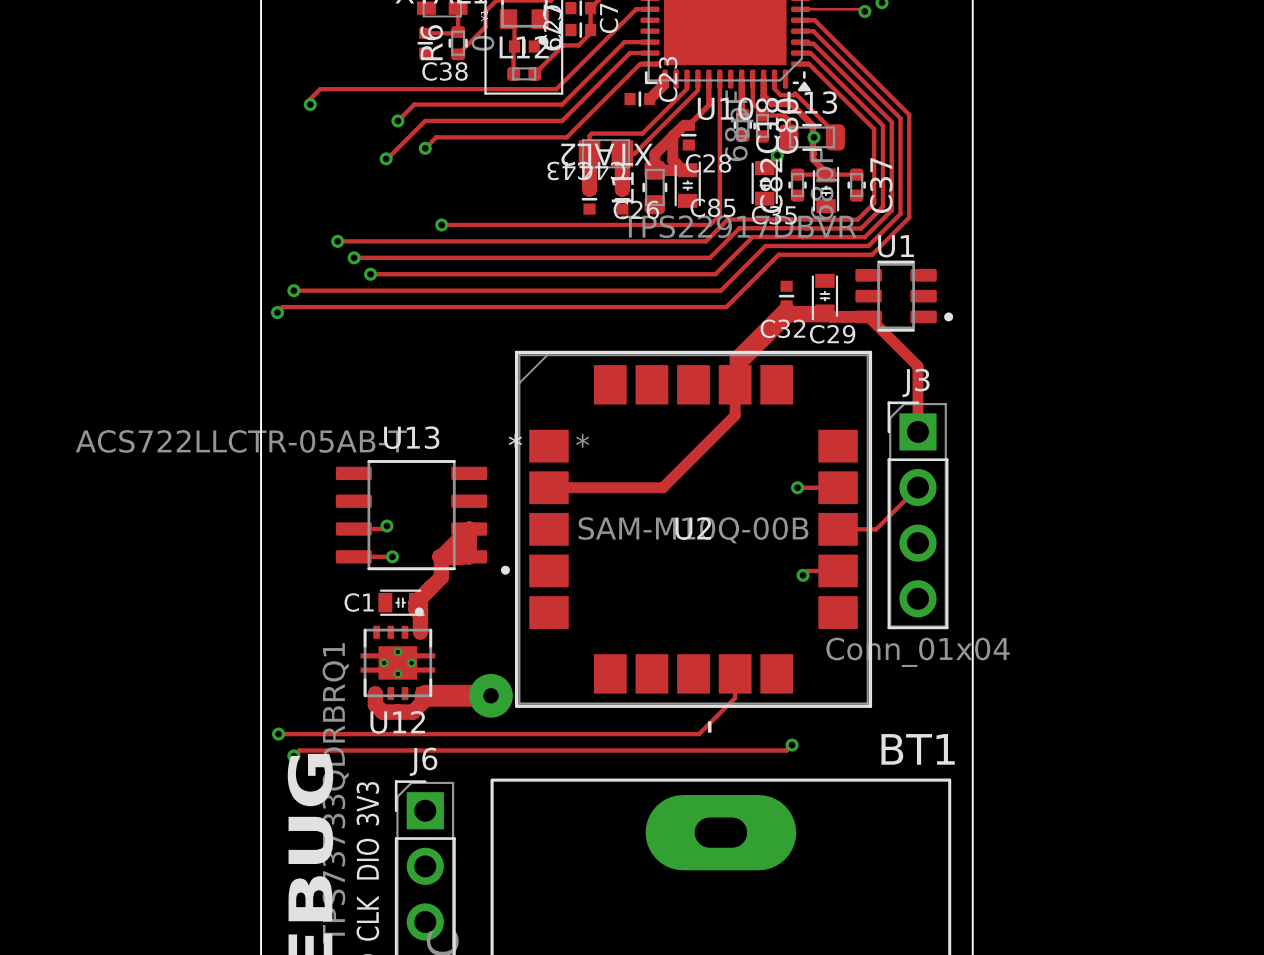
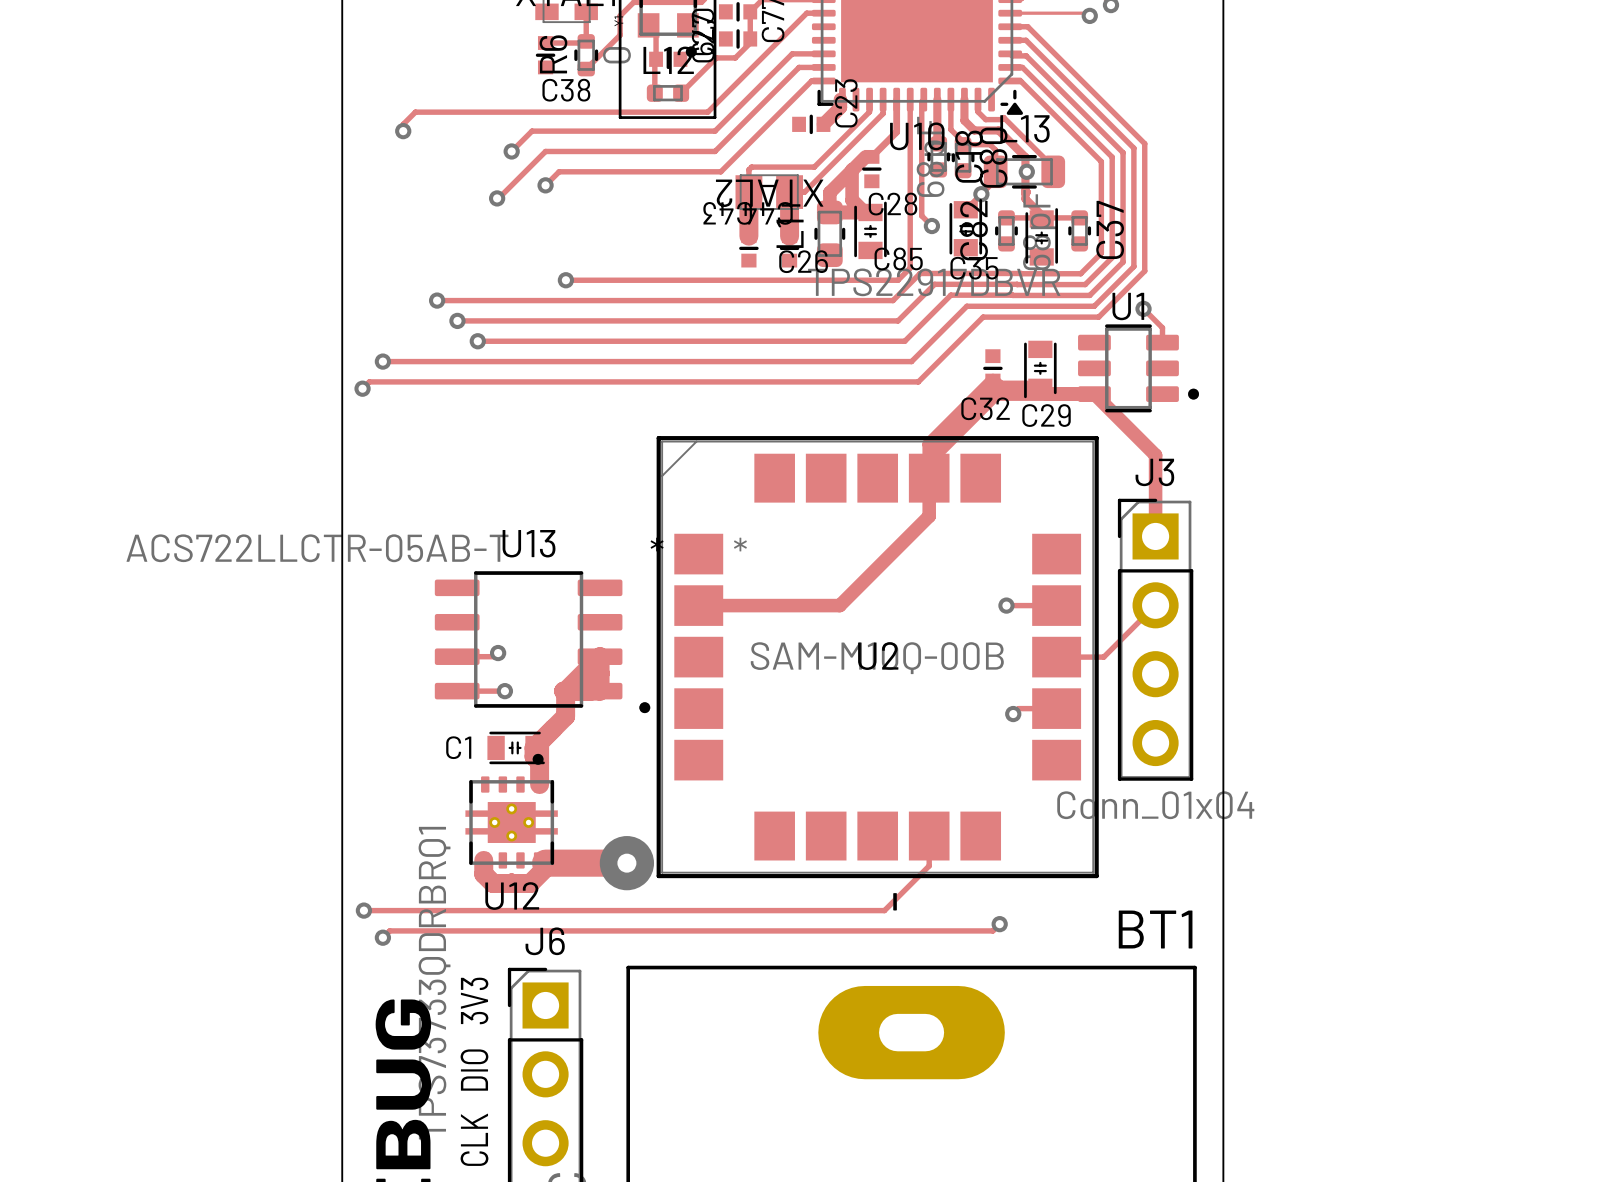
track: none -> (922, 101) (921, 215) (931, 226)
via: none -> (931, 226)
track: none -> (1143, 308) (1162, 327) (1162, 342)
via: none -> (1143, 308)

